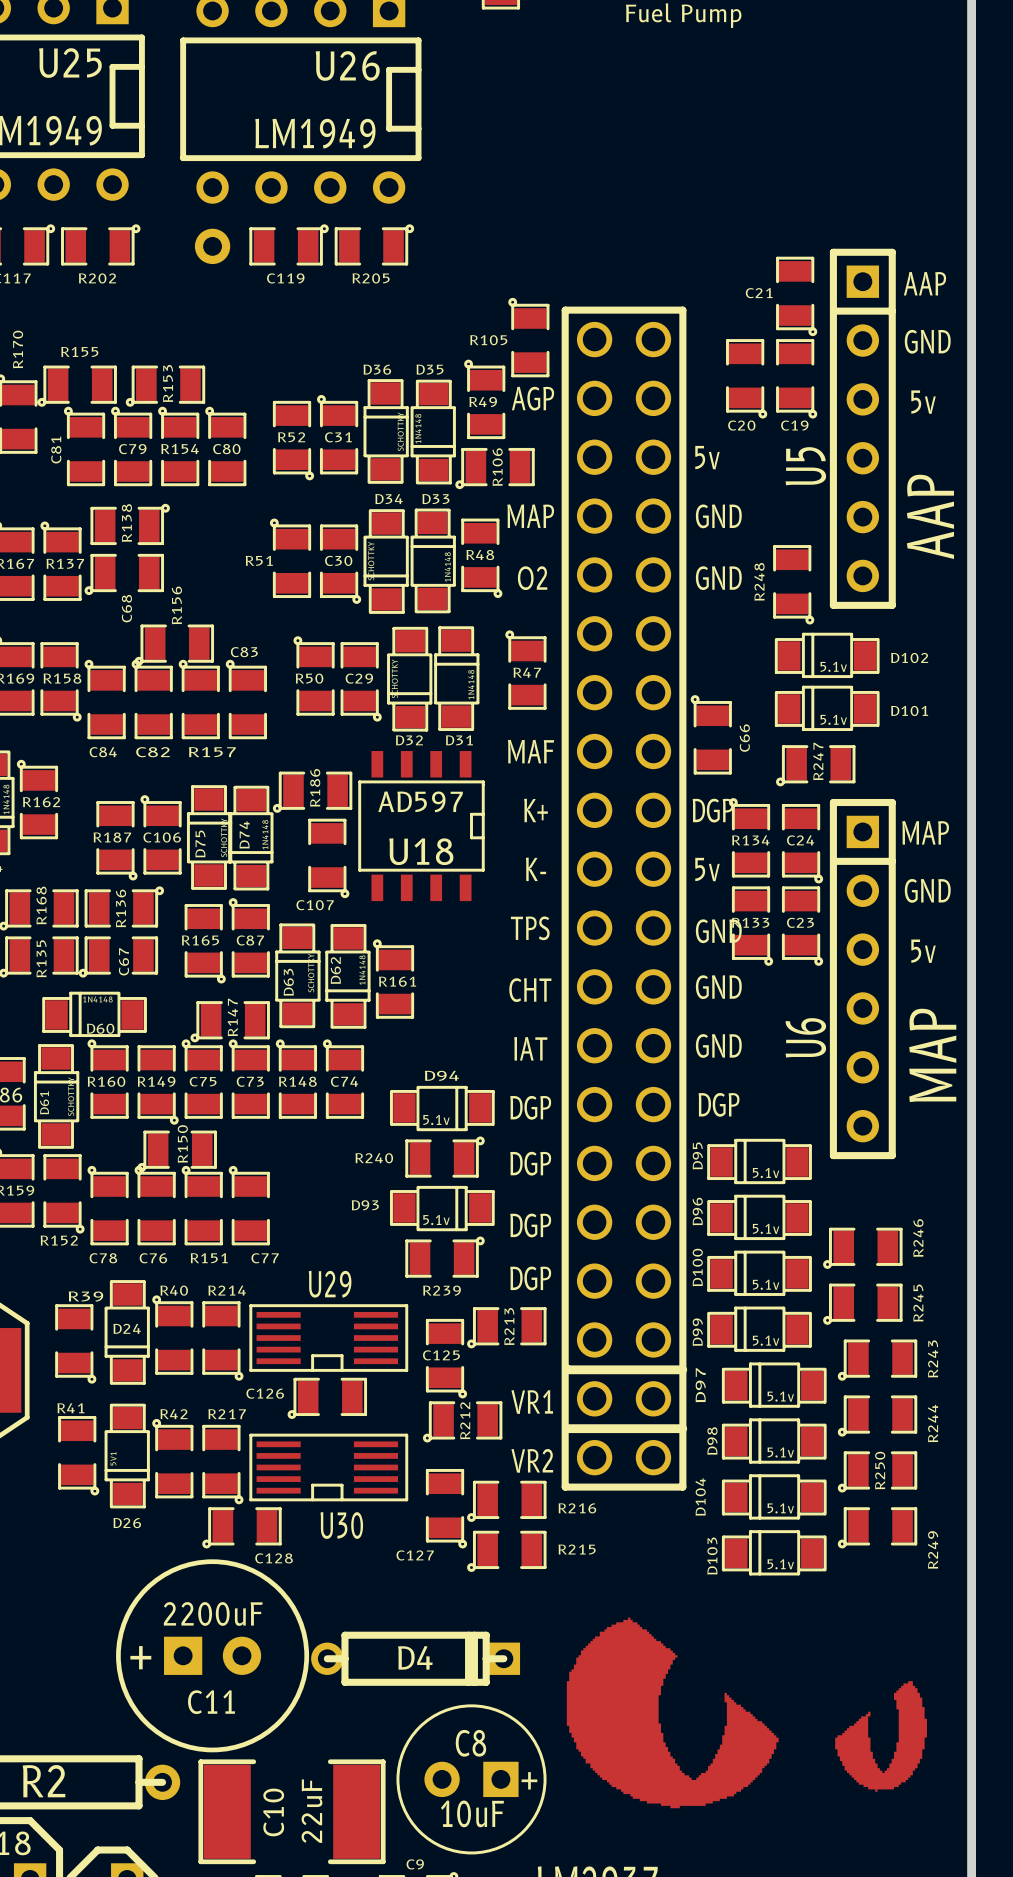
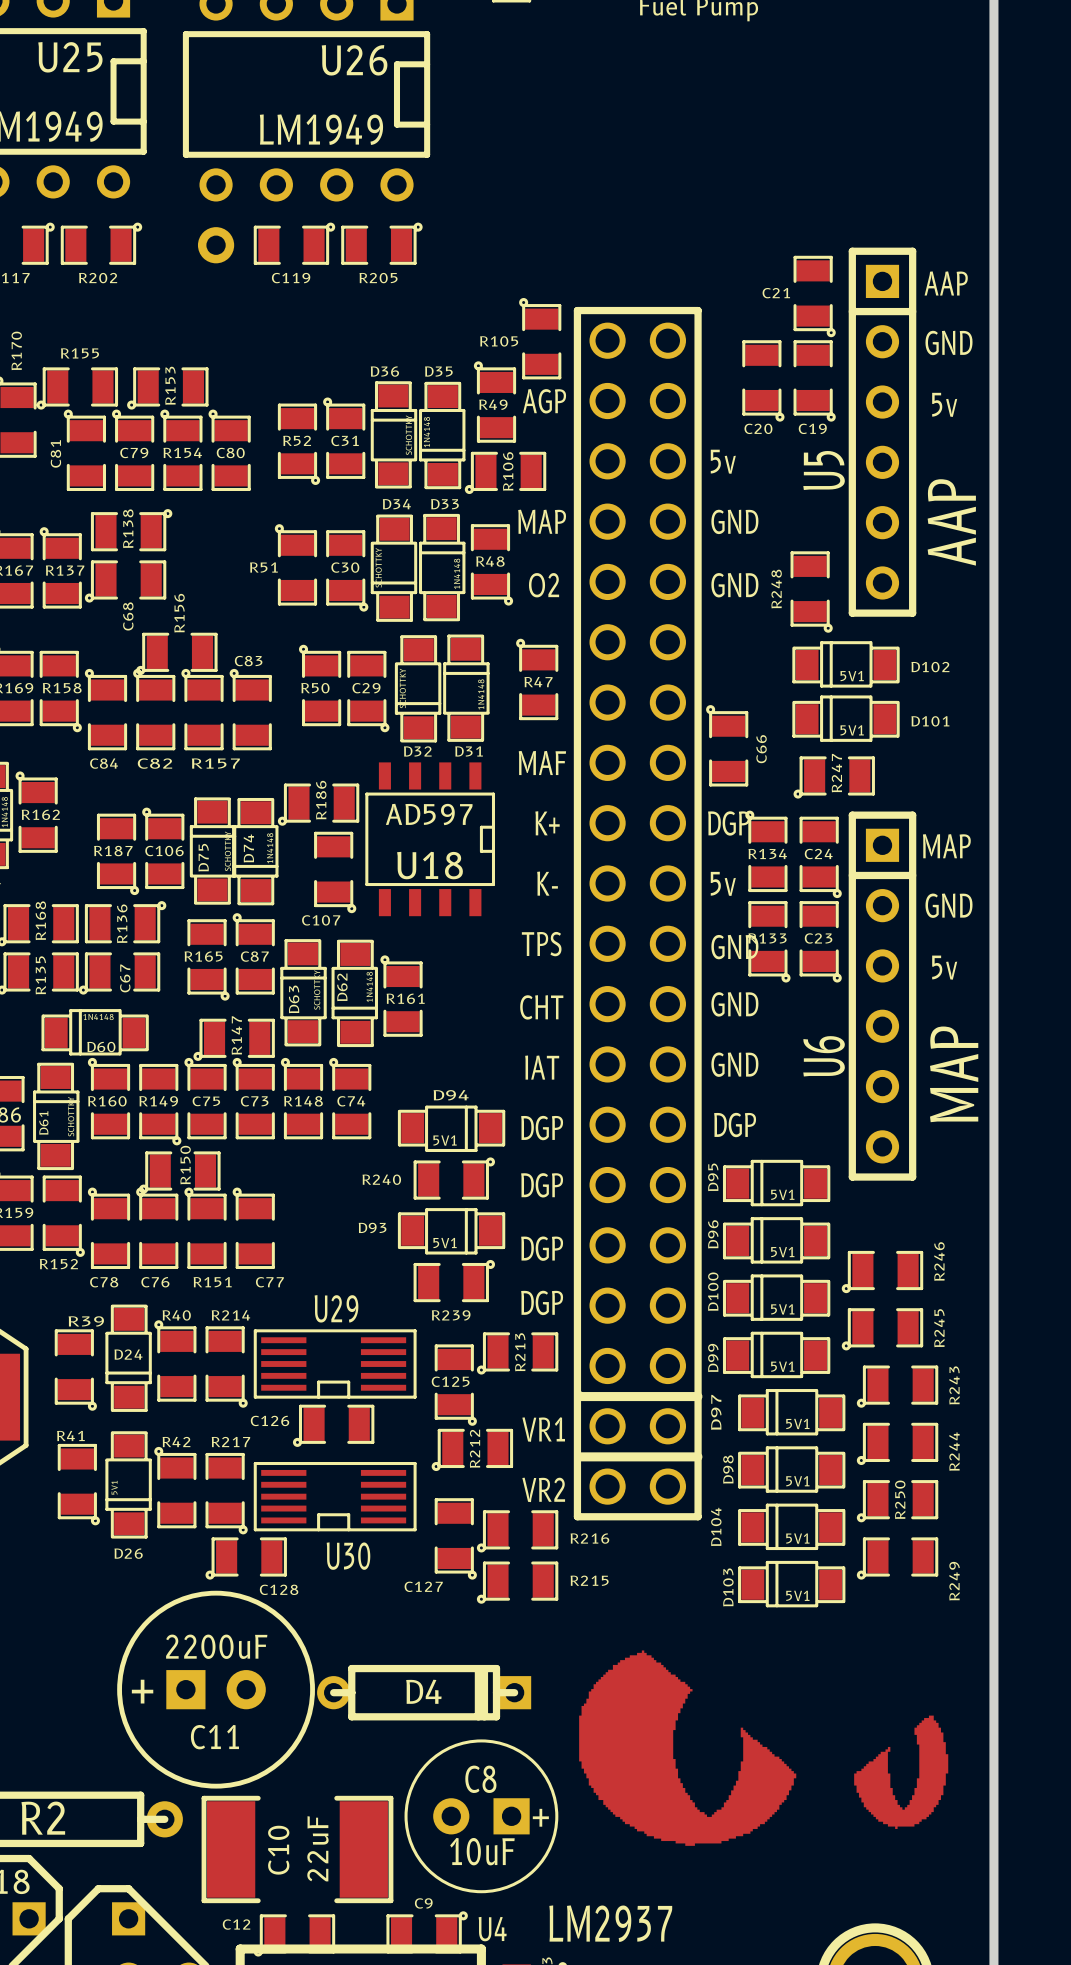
D102 value: 5.1v (833, 666) -> 5V1 (852, 676)
D101 value: 5.1v (833, 719) -> 5V1 (852, 730)
D94 value: 5.1v (436, 1119) -> 5V1 (445, 1140)
D95 value: 5.1v (766, 1172) -> 5V1 (782, 1194)
D93 value: 5.1v (436, 1220) -> 5V1 (445, 1243)
D96 value: 5.1v (766, 1228) -> 5V1 (782, 1252)
D100 value: 5.1v (766, 1284) -> 5V1 (782, 1309)
D99 value: 5.1v (766, 1340) -> 5V1 (782, 1366)
D97 value: 5.1v (780, 1396) -> 5V1 (797, 1423)
D98 value: 5.1v (780, 1452) -> 5V1 (797, 1481)
D104 value: 5.1v (780, 1508) -> 5V1 (797, 1538)
D103 value: 5.1v (780, 1564) -> 5V1 (797, 1595)

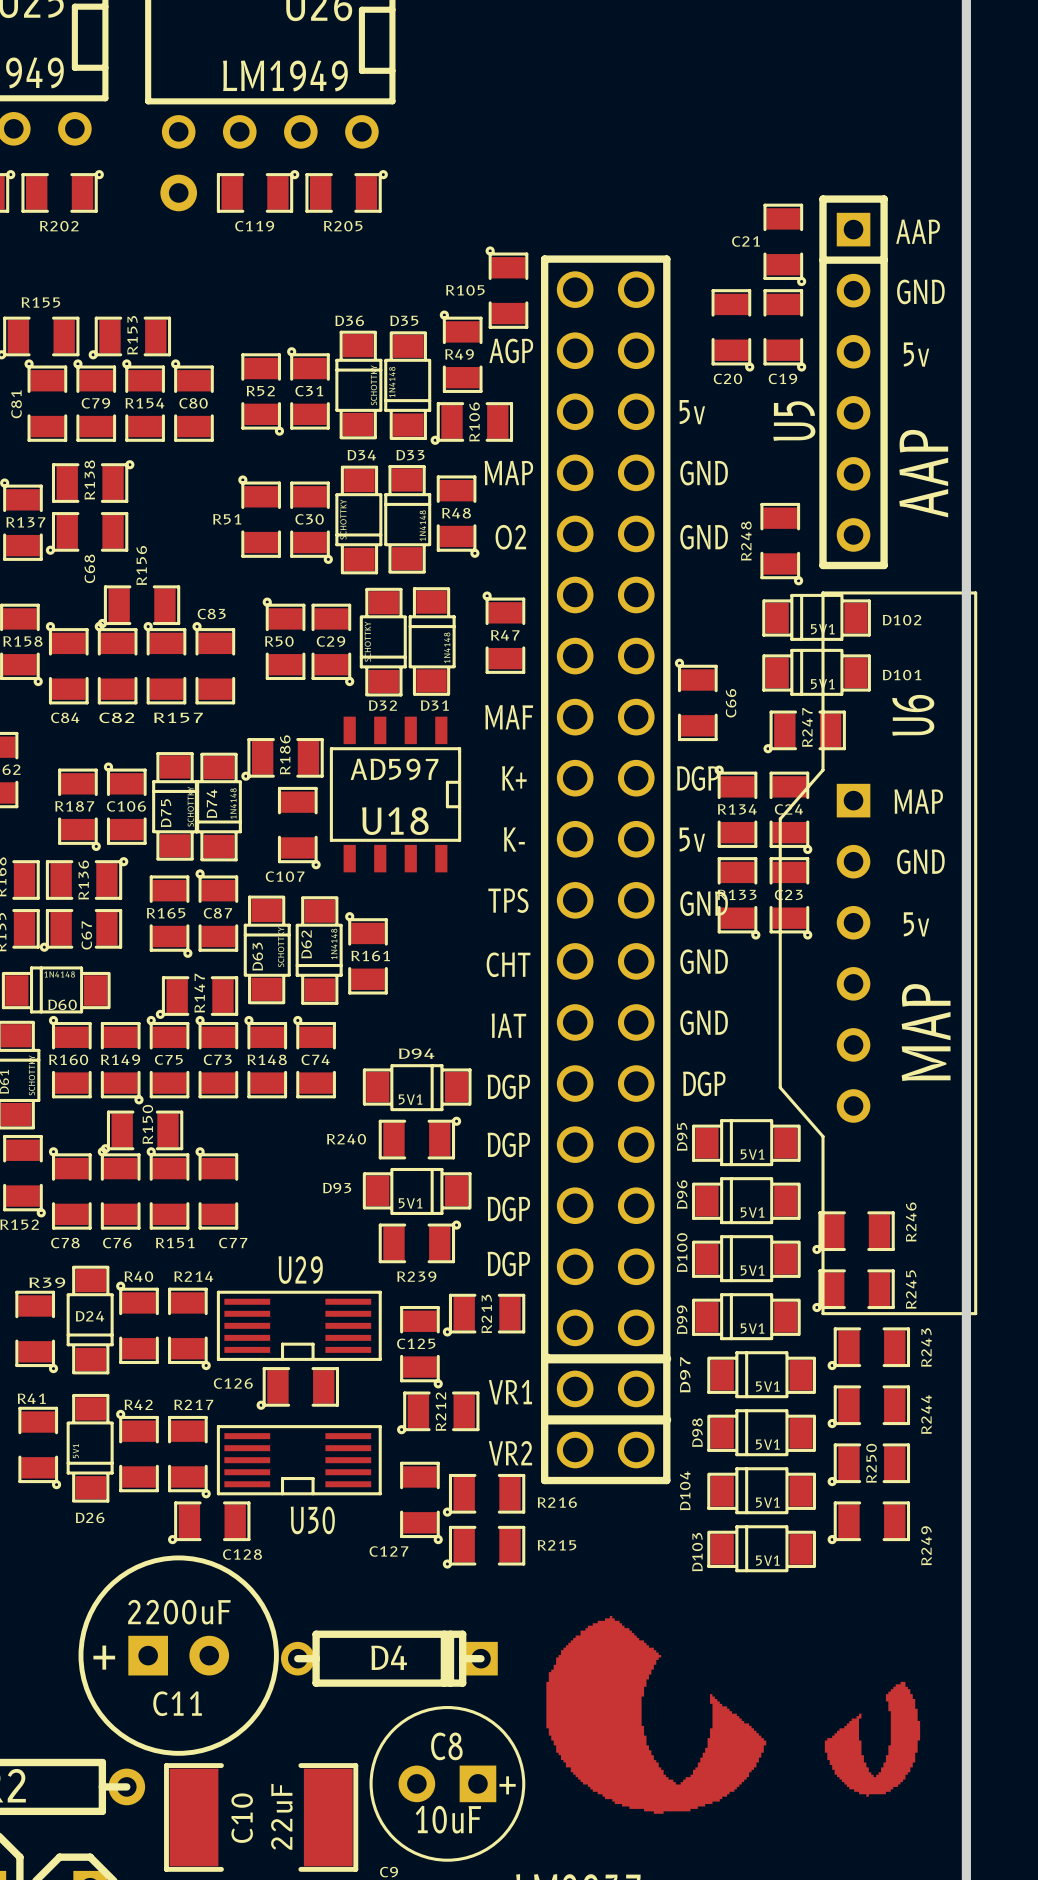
U6 footprint: [848, 811, 917, 1181] -> [778, 591, 978, 1316]
U6 name position: U6 (824, 1056) -> U6 (913, 715)

